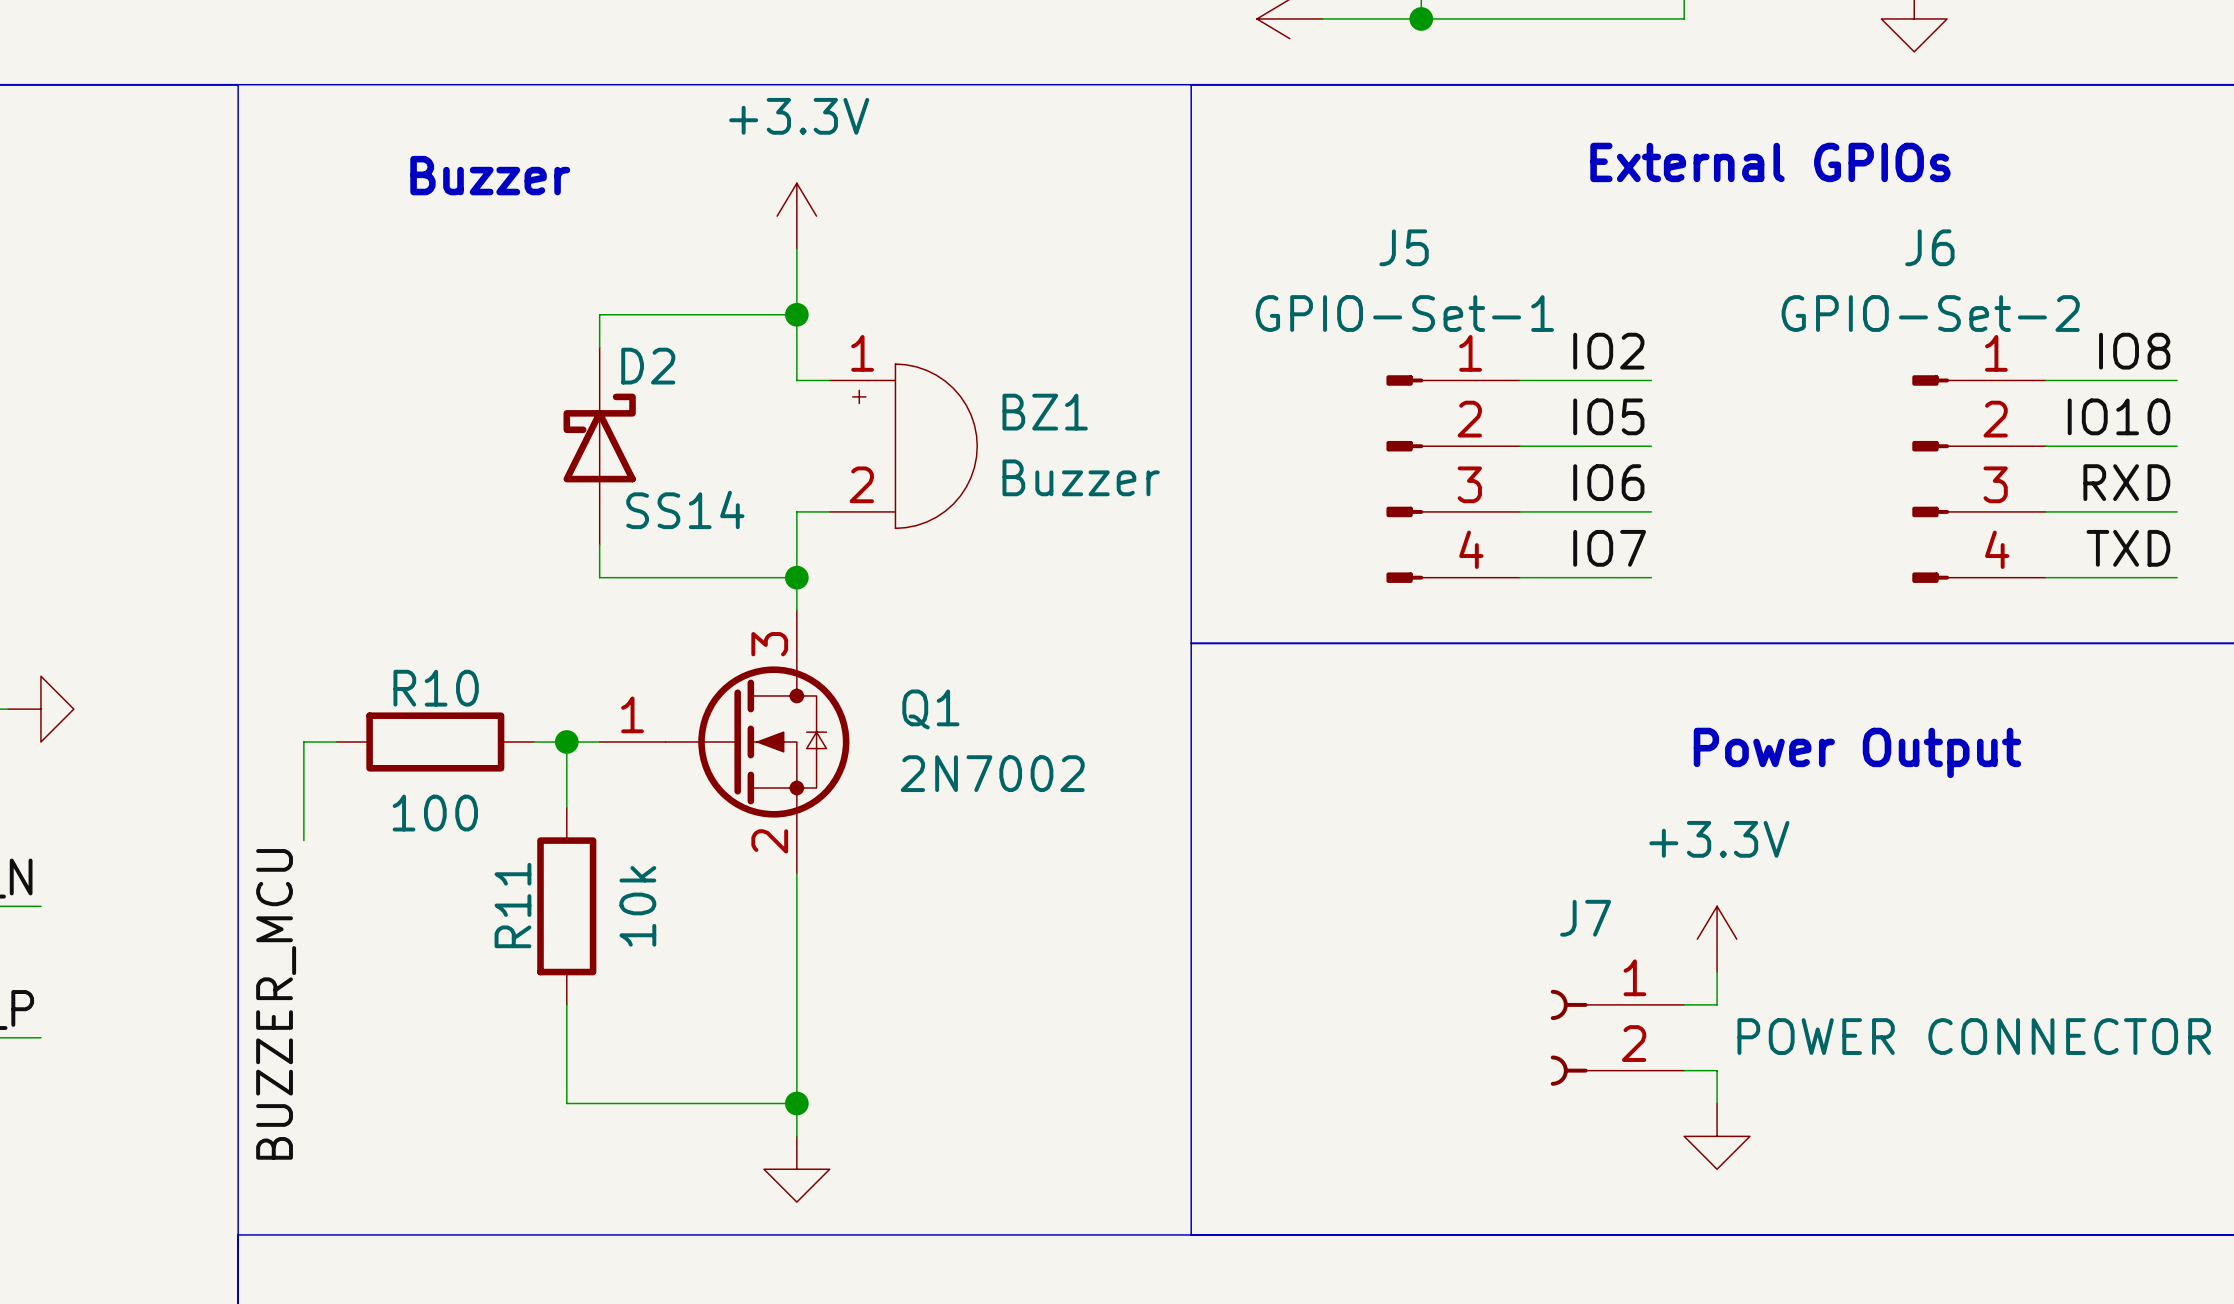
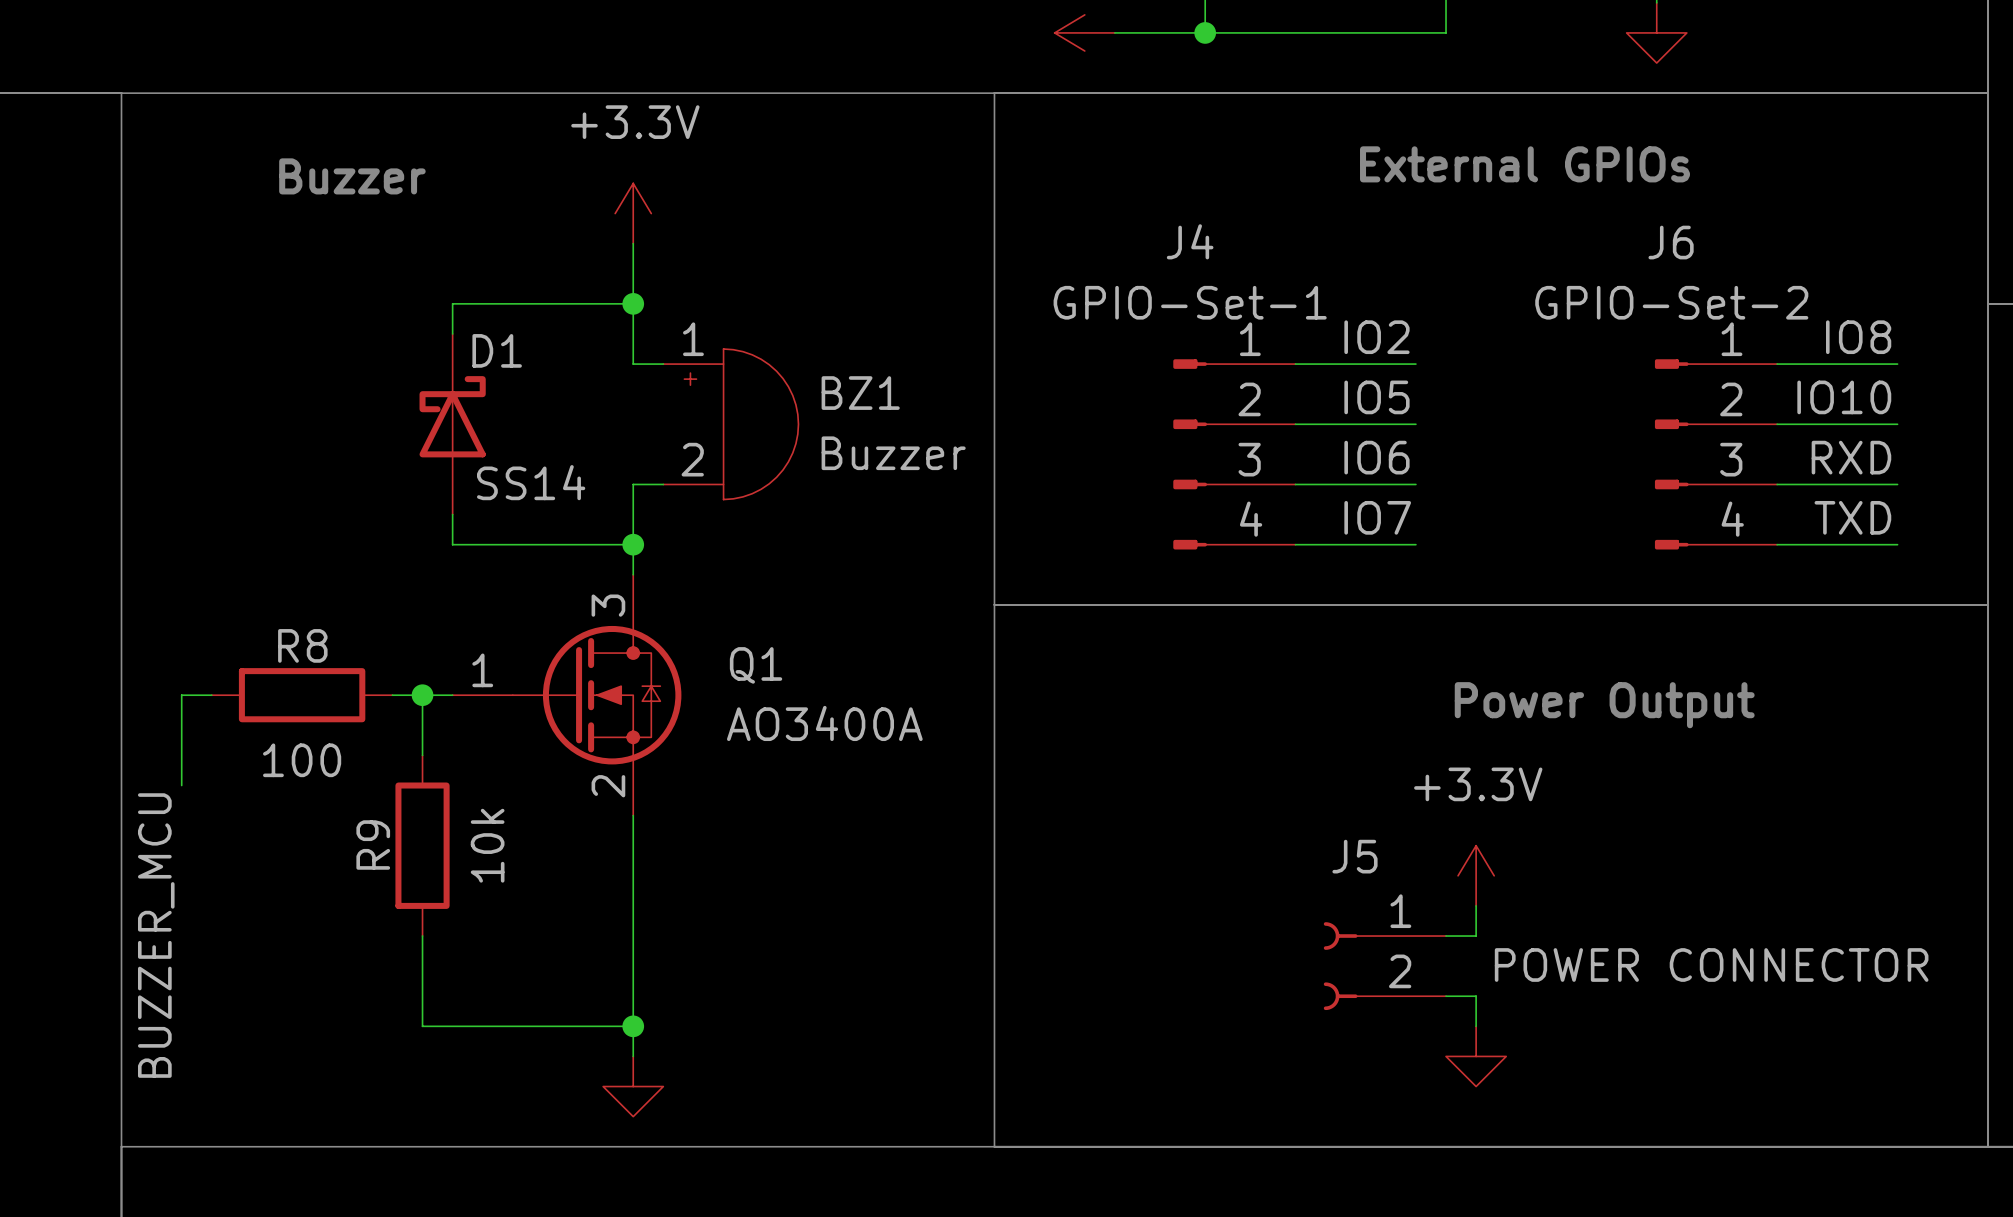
J5 name: J5 (1404, 247) -> J4 (1190, 241)
D2 name: D2 (648, 366) -> D1 (497, 350)
R10 name: R10 (436, 688) -> R8 (302, 645)
Q1 value: 2N7002 (992, 773) -> AO3400A (824, 723)
R11 name: R11 (512, 905) -> R9 (373, 844)
J7 name: J7 (1585, 918) -> J5 (1354, 856)

